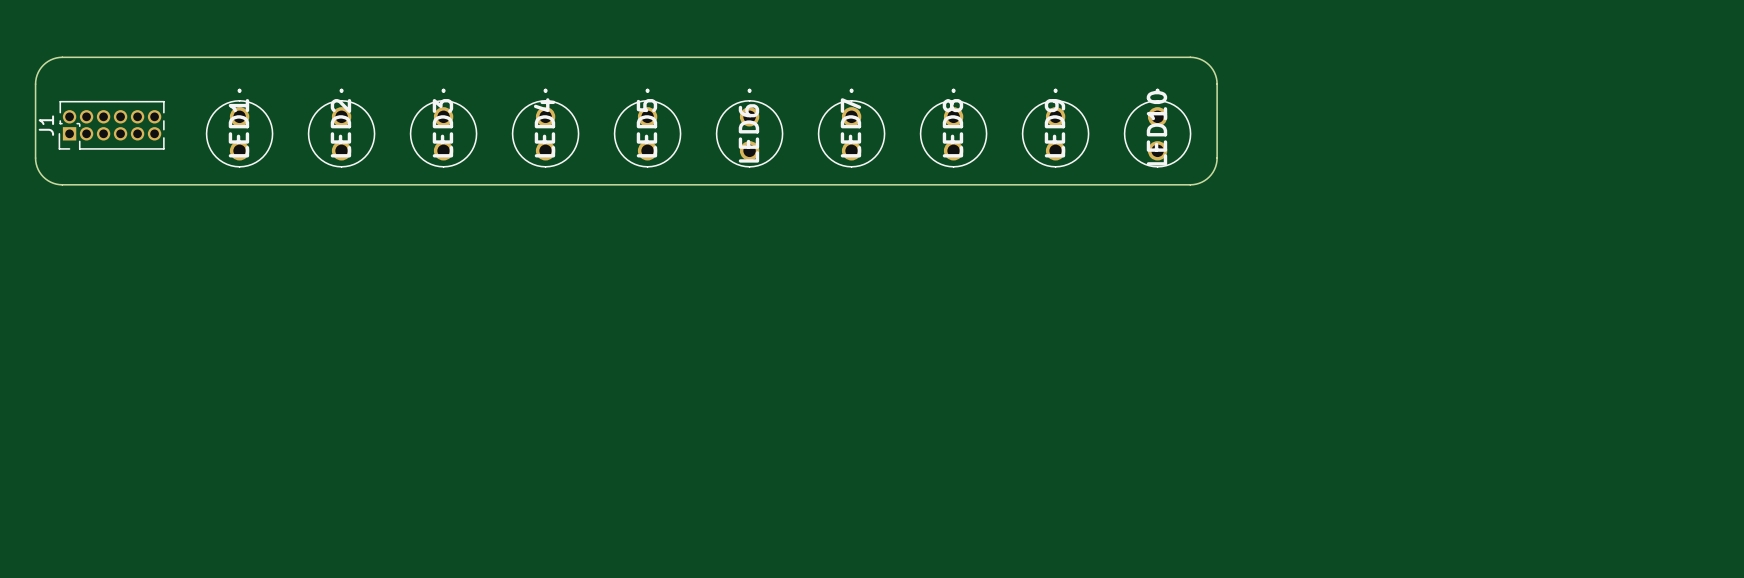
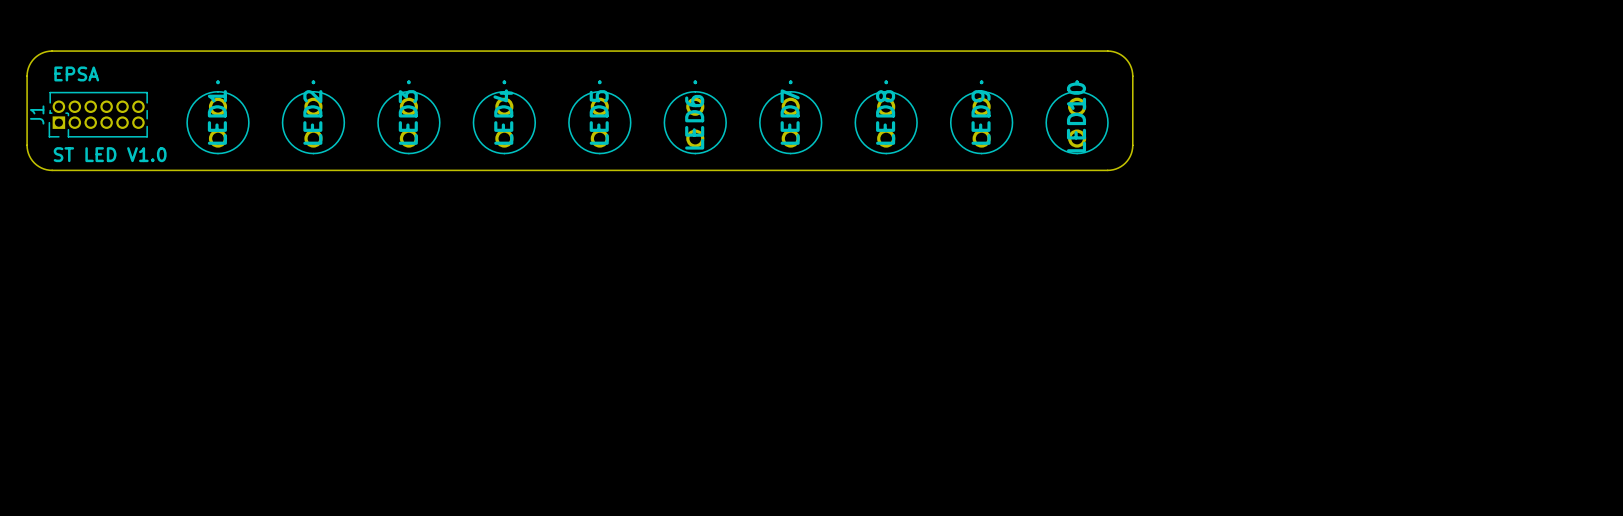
text: none -> EPSA (76, 73)
text: none -> ST LED V1.0 (110, 154)

